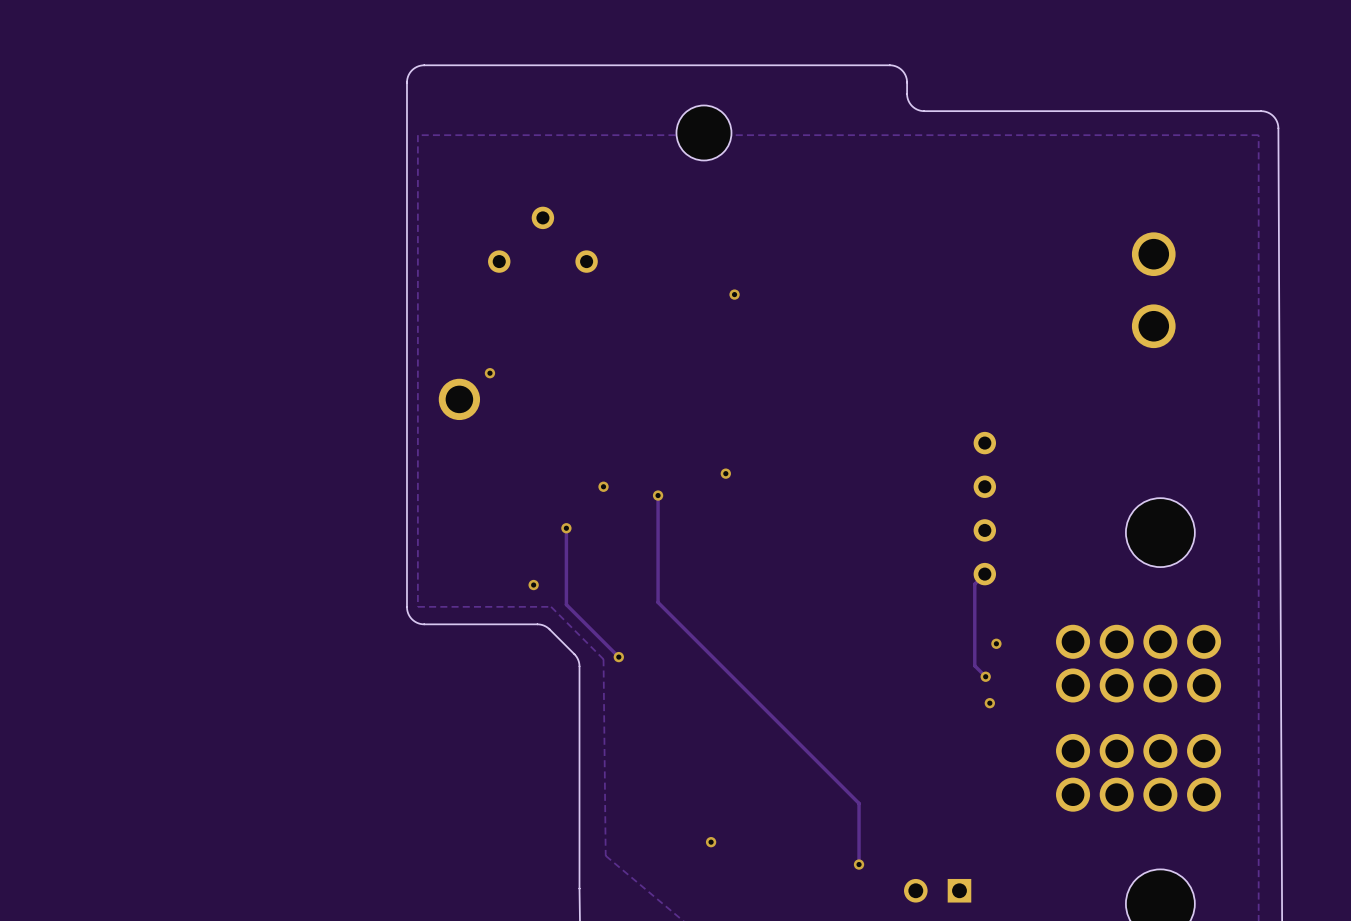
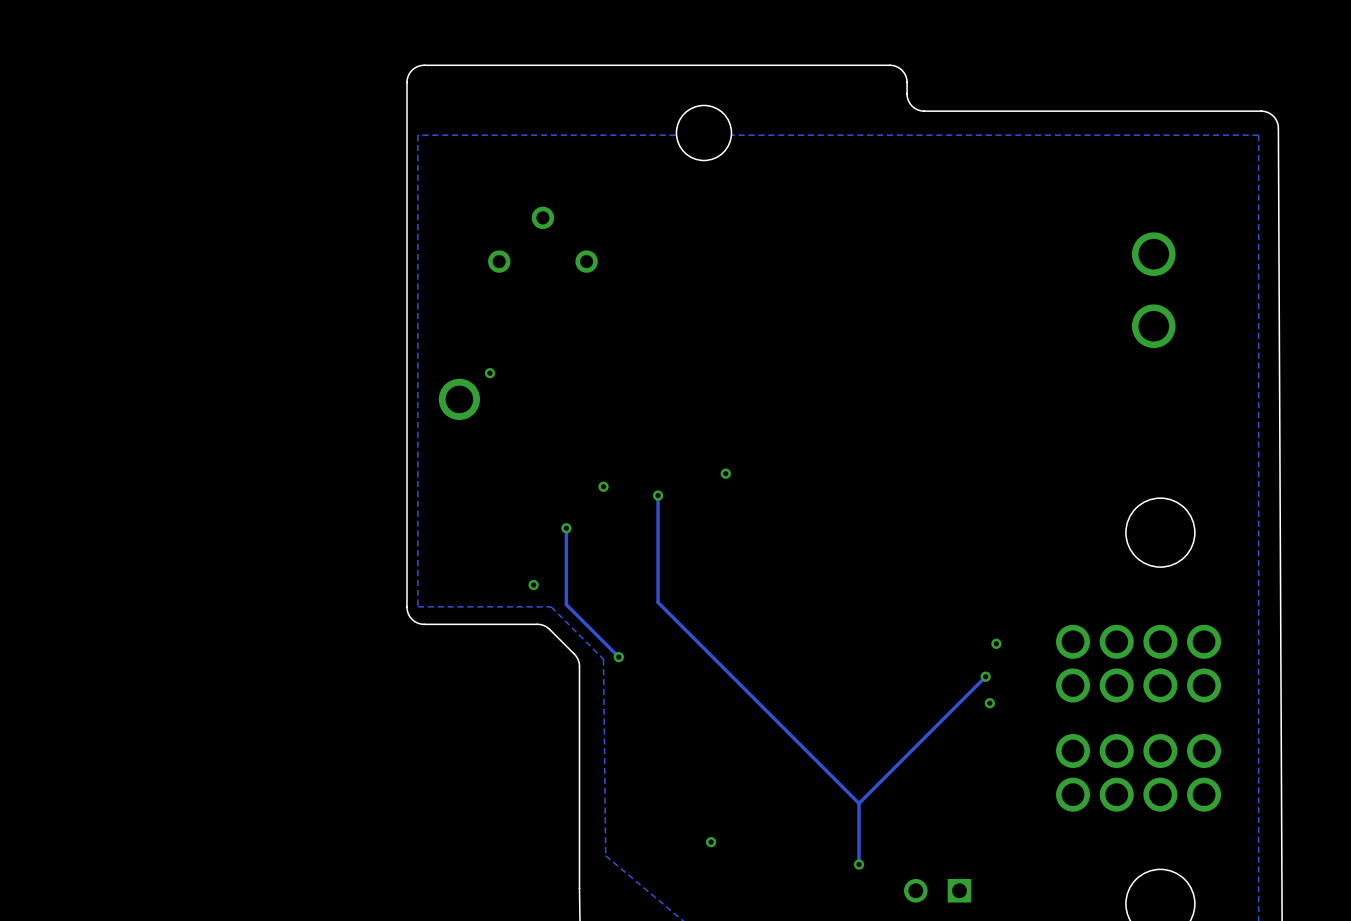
via: (734, 294) -> none
part: (984, 508) -> none
track: (984, 574) (974, 584) (974, 665) (985, 676) -> (859, 803) (985, 676)

